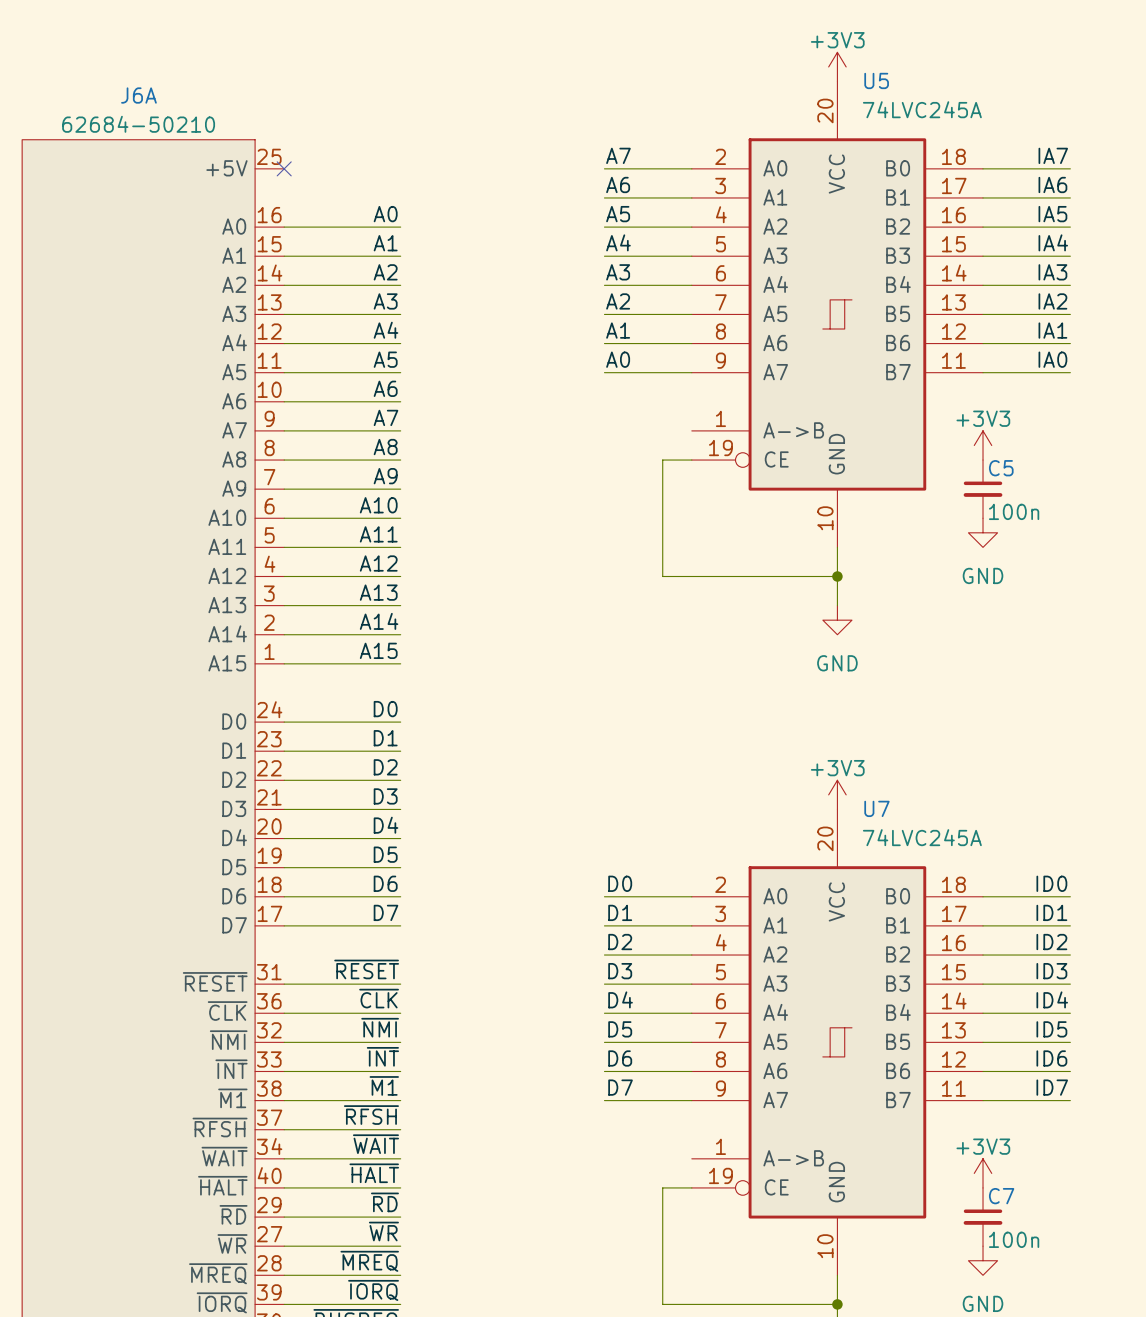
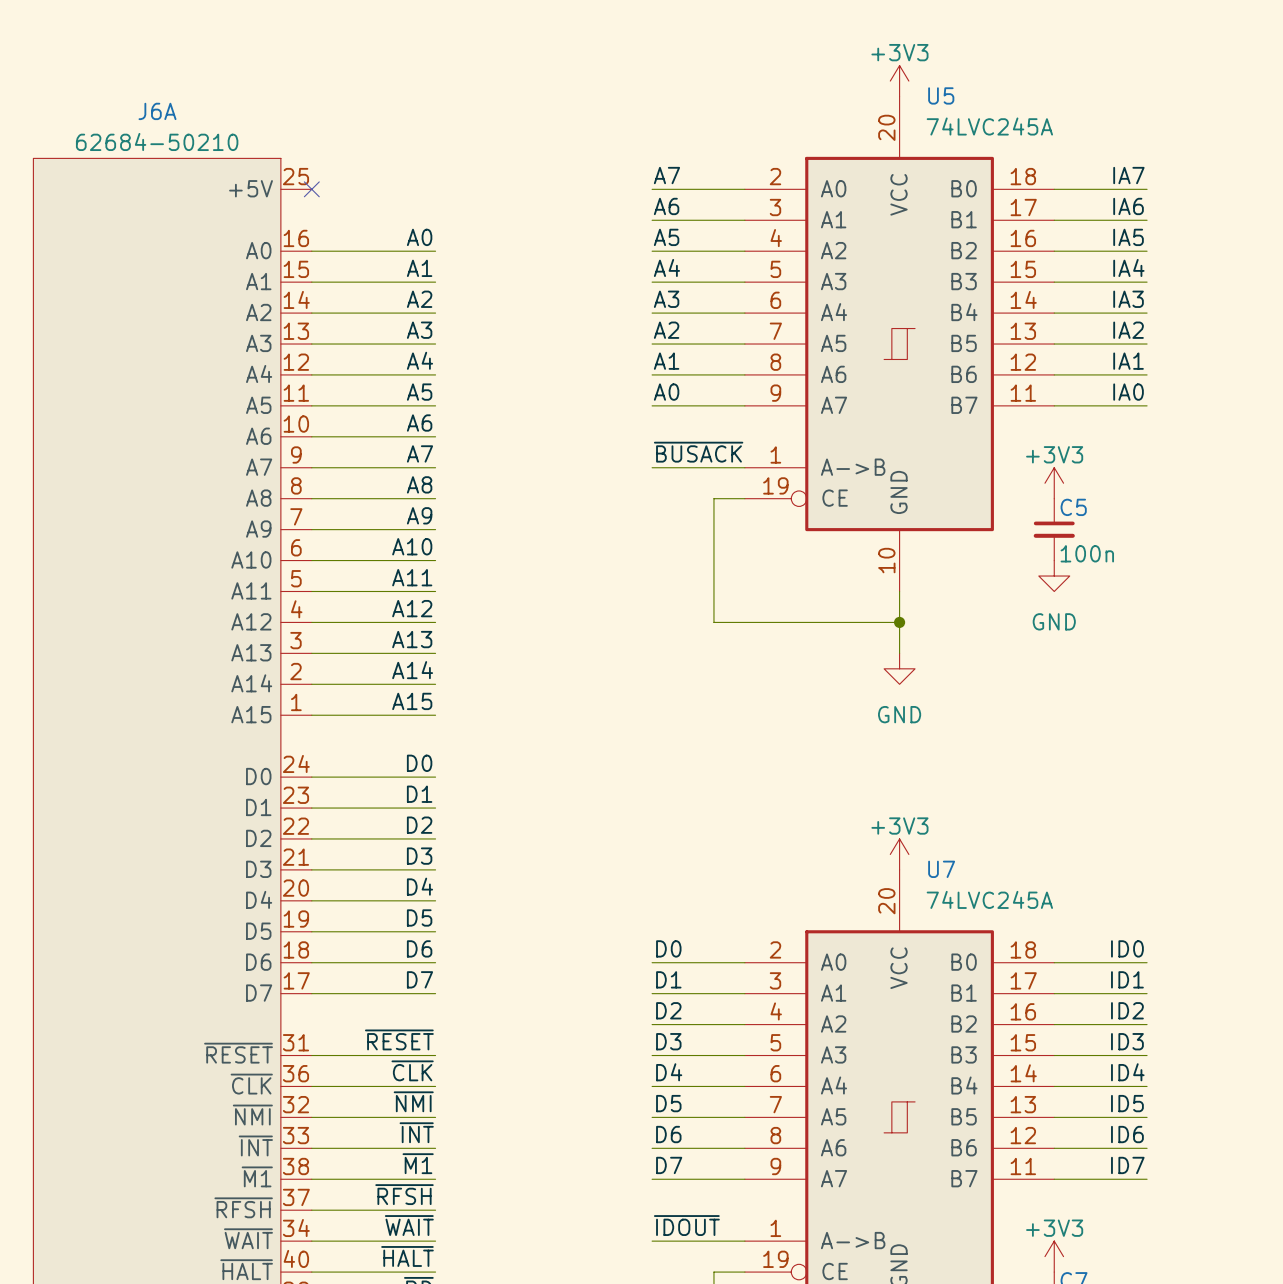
label: none -> ~{BUSACK} (698, 452)
wire: none -> (652, 467) (744, 467)
label: none -> ~{IDOUT} (686, 1225)
wire: none -> (652, 1241) (744, 1241)

